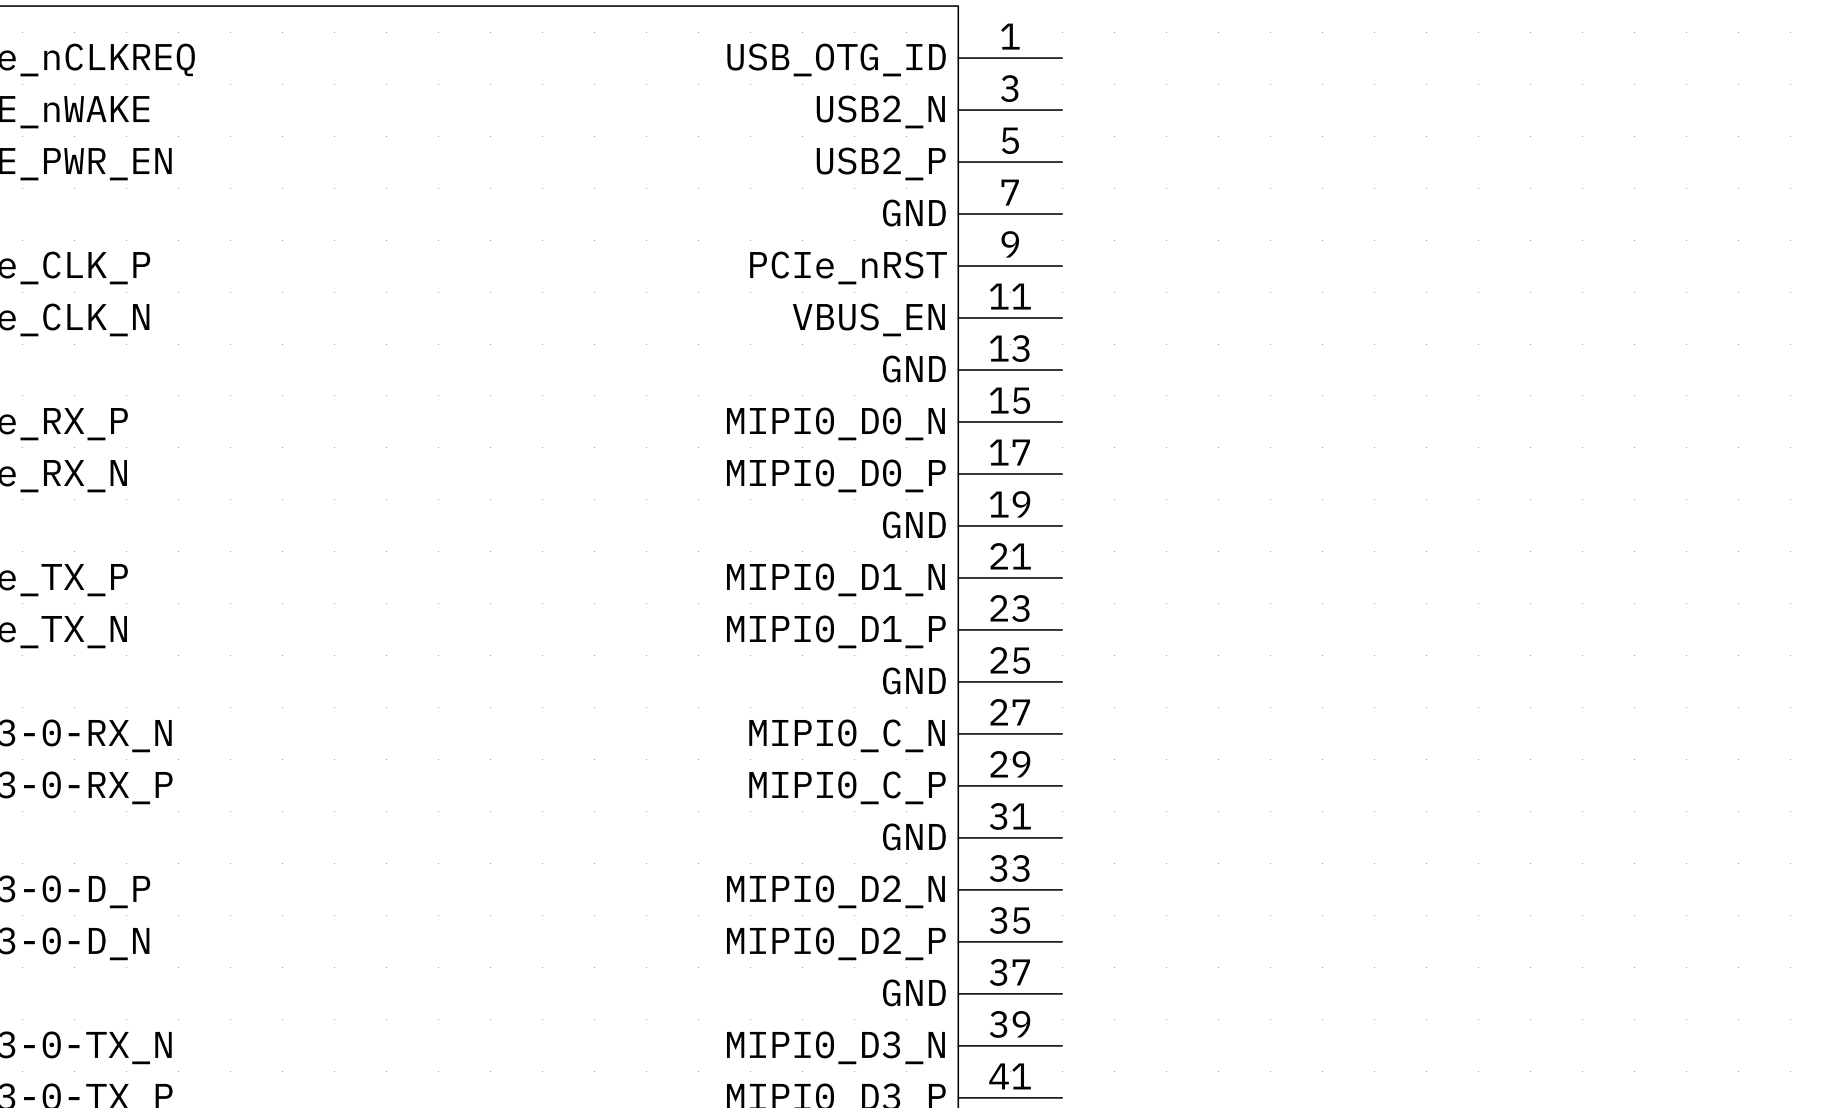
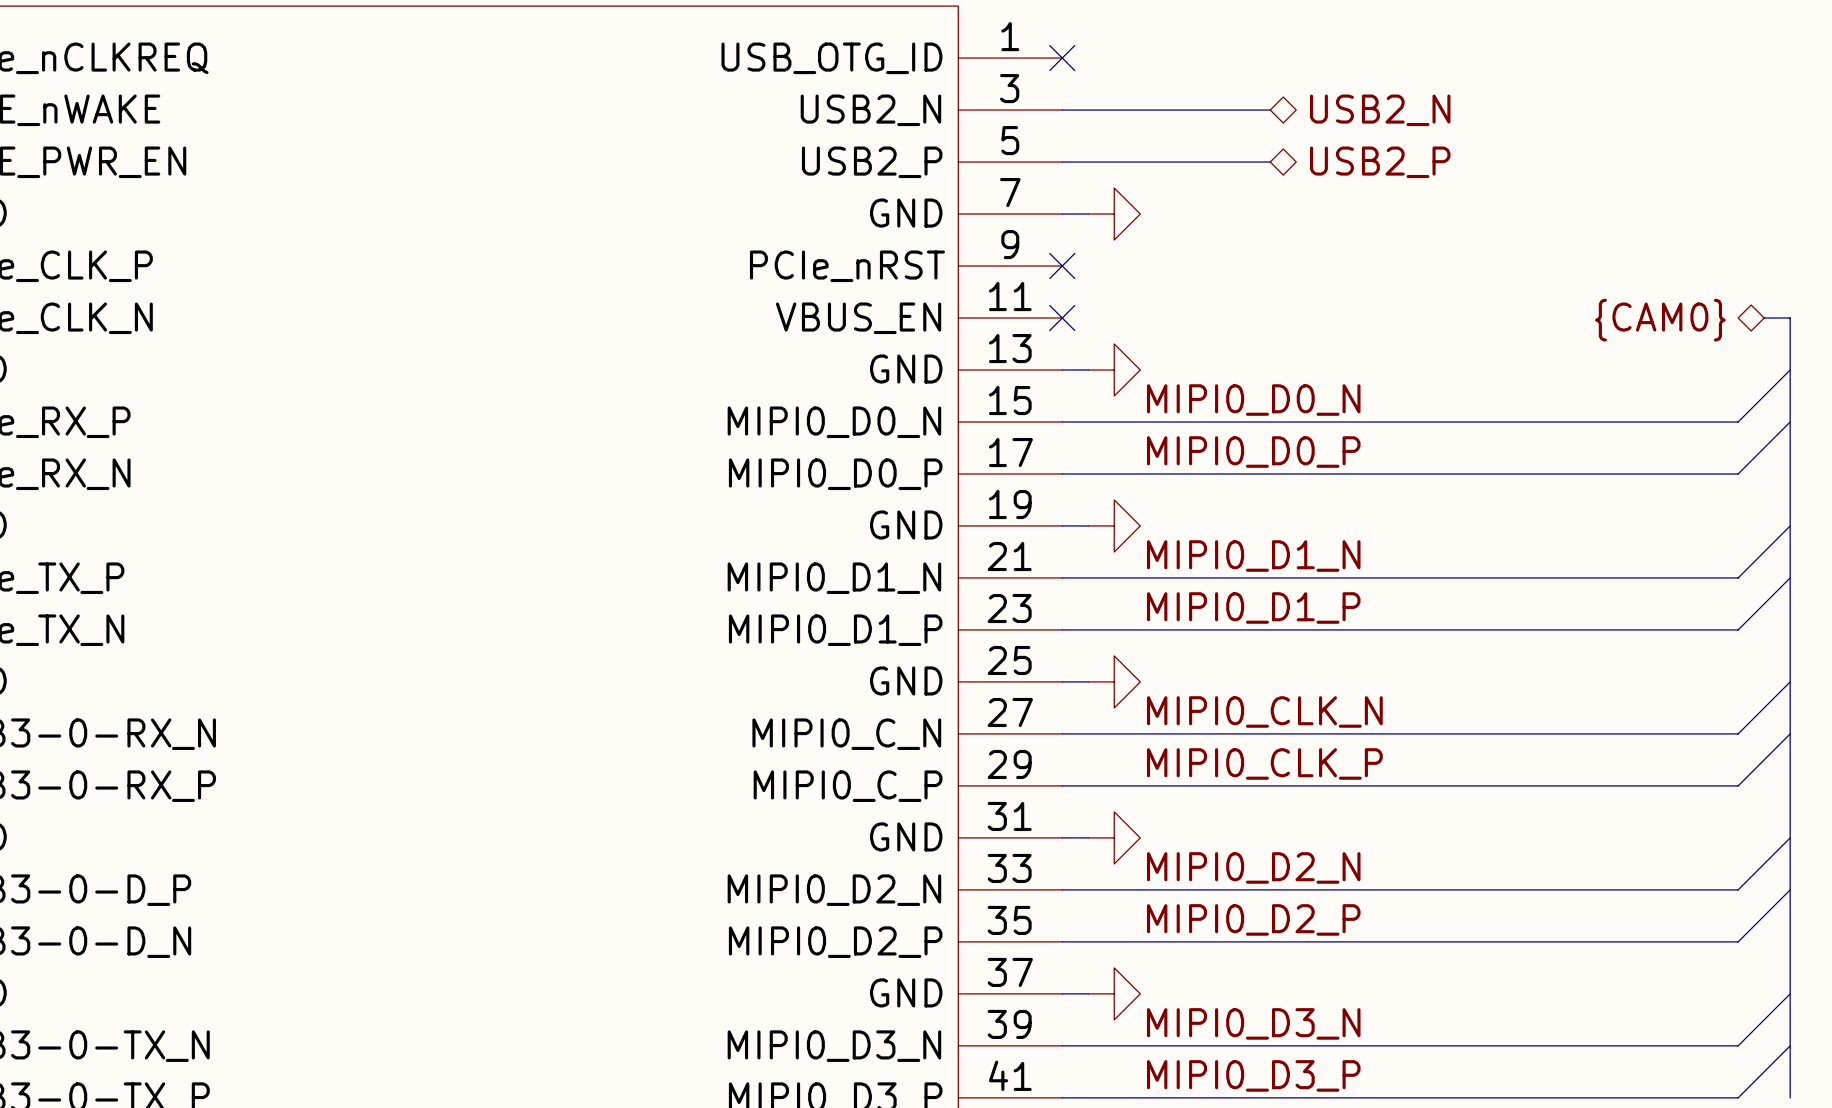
no-connect mark: none -> (1062, 58)
wire: none -> (1062, 110) (1270, 110)
hierarchical label: none -> USB2_N (1380, 110)
wire: none -> (1062, 162) (1270, 162)
hierarchical label: none -> USB2_P (1380, 162)
wire: none -> (1062, 214) (1088, 214)
power symbol: none -> (1114, 214)
no-connect mark: none -> (1062, 266)
no-connect mark: none -> (1062, 318)
hierarchical label: none -> {CAM0} (1660, 320)
bus: none -> (1764, 318) (1790, 318) (1790, 1097)
wire: none -> (1062, 369) (1088, 369)
power symbol: none -> (1114, 369)
wire: none -> (1790, 369) (1738, 421) (1062, 421)
label: none -> MIPI0_D0_N (1253, 400)
wire: none -> (1790, 421) (1738, 473) (1062, 473)
label: none -> MIPI0_D0_P (1253, 452)
wire: none -> (1062, 525) (1088, 525)
power symbol: none -> (1114, 525)
wire: none -> (1790, 525) (1738, 577) (1062, 577)
label: none -> MIPI0_D1_N (1253, 556)
wire: none -> (1790, 577) (1738, 629) (1062, 629)
label: none -> MIPI0_D1_P (1253, 607)
wire: none -> (1062, 681) (1088, 681)
power symbol: none -> (1114, 681)
wire: none -> (1790, 681) (1738, 733) (1062, 733)
label: none -> MIPI0_CLK_N (1264, 711)
wire: none -> (1790, 733) (1738, 785) (1062, 785)
label: none -> MIPI0_CLK_P (1264, 763)
wire: none -> (1062, 837) (1088, 837)
power symbol: none -> (1114, 837)
wire: none -> (1790, 837) (1738, 889) (1062, 889)
label: none -> MIPI0_D2_N (1253, 867)
wire: none -> (1790, 889) (1738, 941) (1062, 941)
label: none -> MIPI0_D2_P (1253, 919)
wire: none -> (1062, 993) (1088, 993)
power symbol: none -> (1114, 993)
wire: none -> (1790, 993) (1738, 1045) (1062, 1045)
label: none -> MIPI0_D3_N (1253, 1023)
wire: none -> (1790, 1045) (1738, 1097) (1062, 1097)
label: none -> MIPI0_D3_P (1253, 1075)

